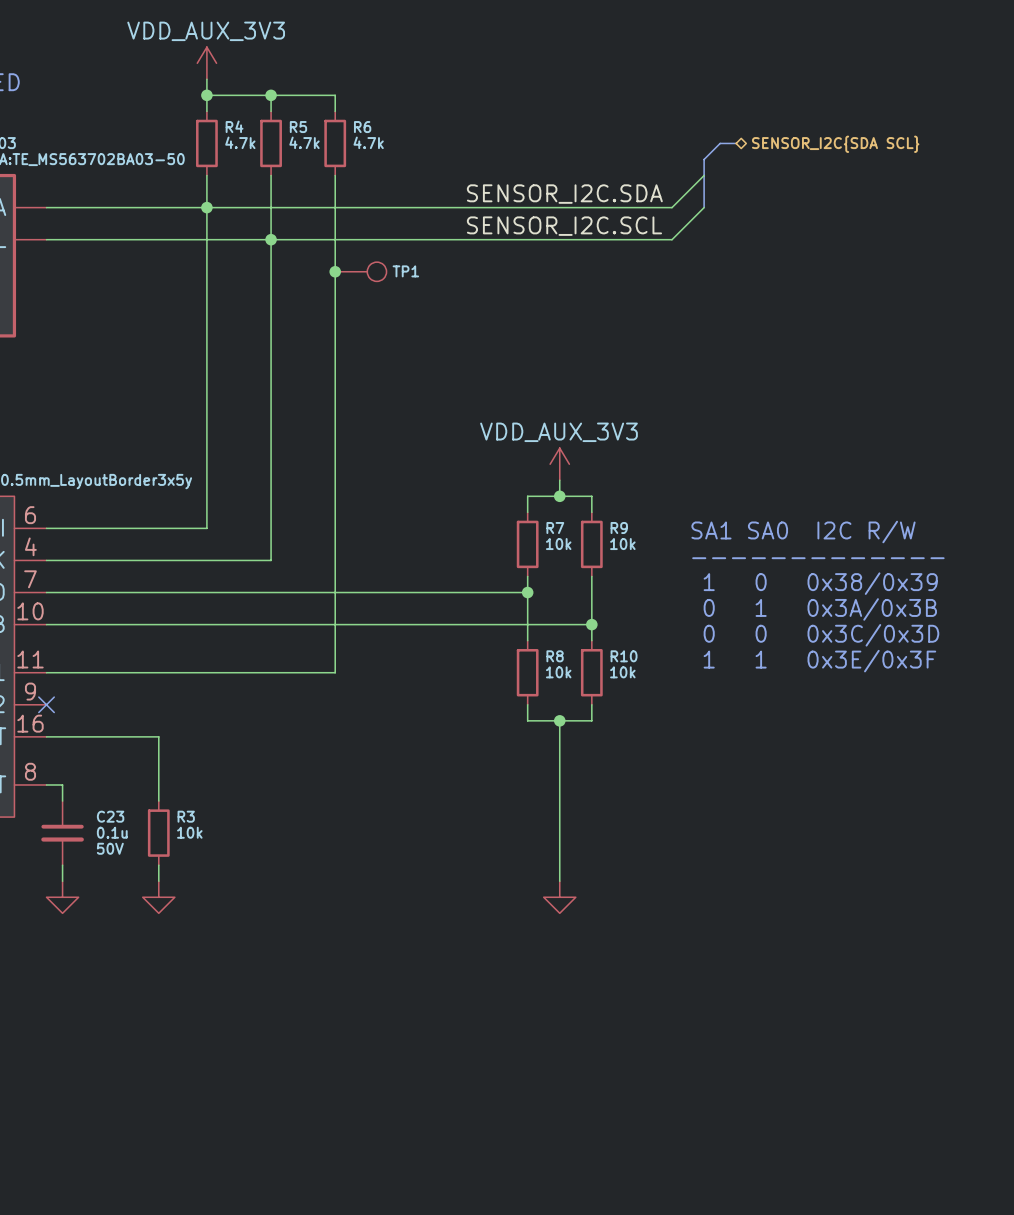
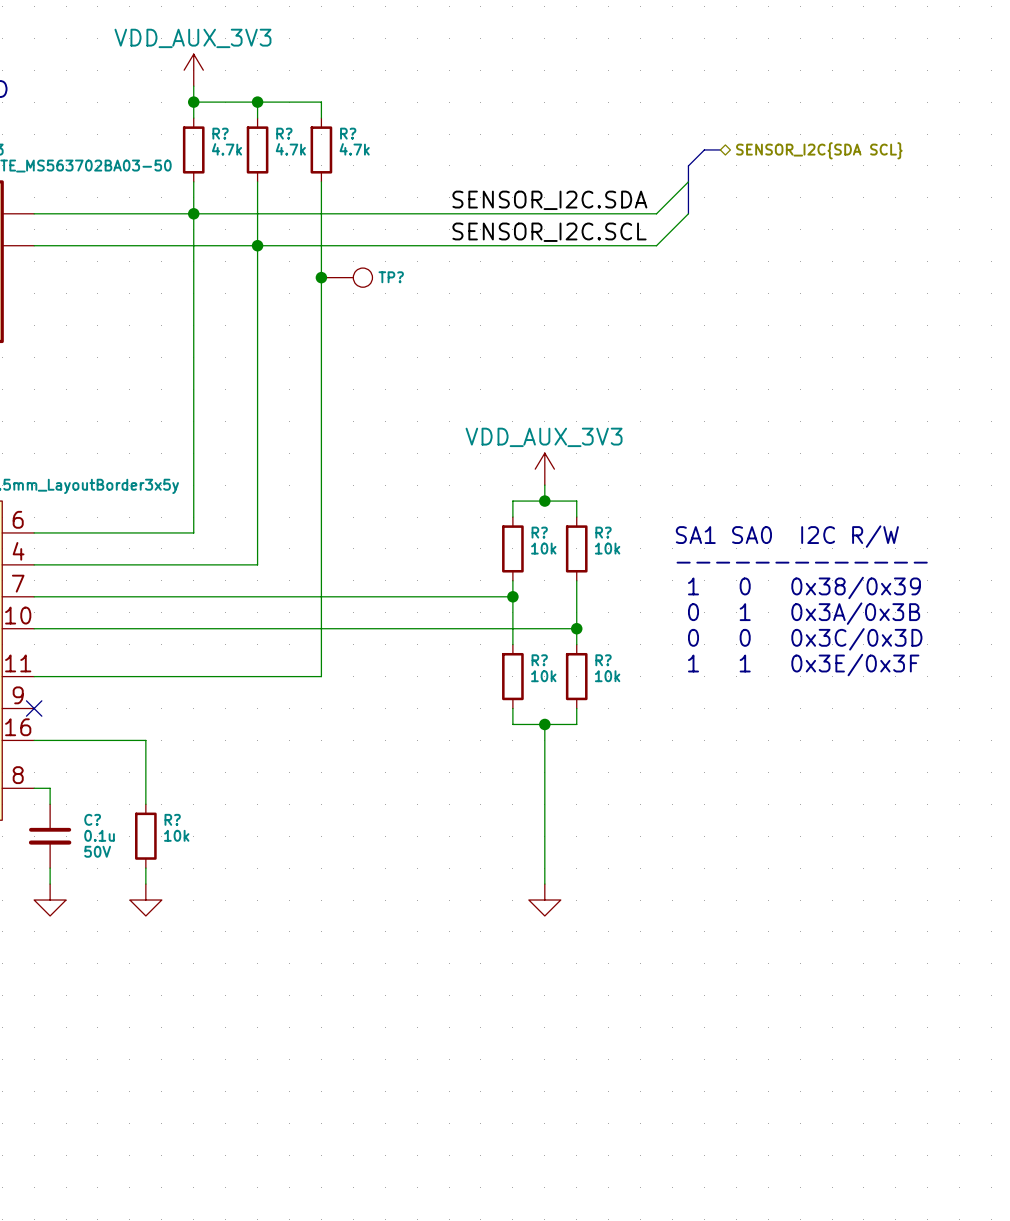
R4 name: R4 (234, 126) -> R? (220, 133)
R5 name: R5 (298, 127) -> R? (284, 133)
R6 name: R6 (362, 127) -> R? (348, 133)
TP1 name: TP1 (405, 271) -> TP? (391, 277)
R7 name: R7 (555, 528) -> R? (539, 532)
R9 name: R9 (619, 528) -> R? (603, 532)
R8 name: R8 (555, 656) -> R? (539, 660)
R10 name: R10 (624, 656) -> R? (603, 660)
C23 name: C23 (110, 816) -> C? (92, 819)
R3 name: R3 (186, 816) -> R? (172, 819)

